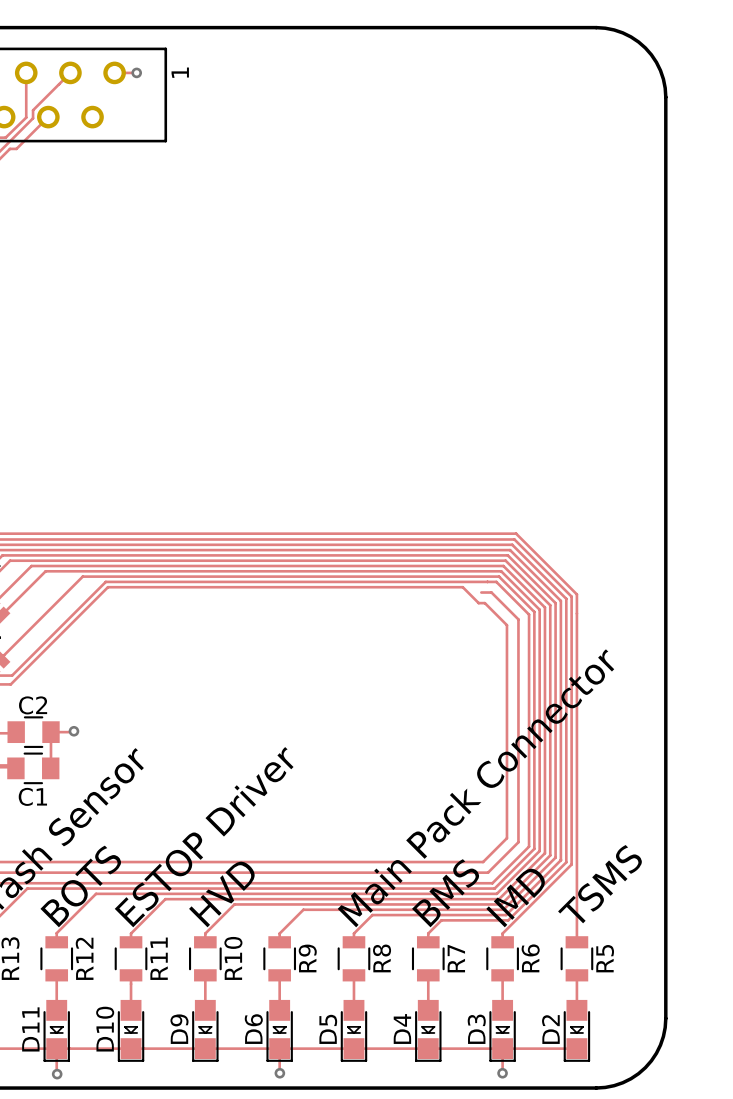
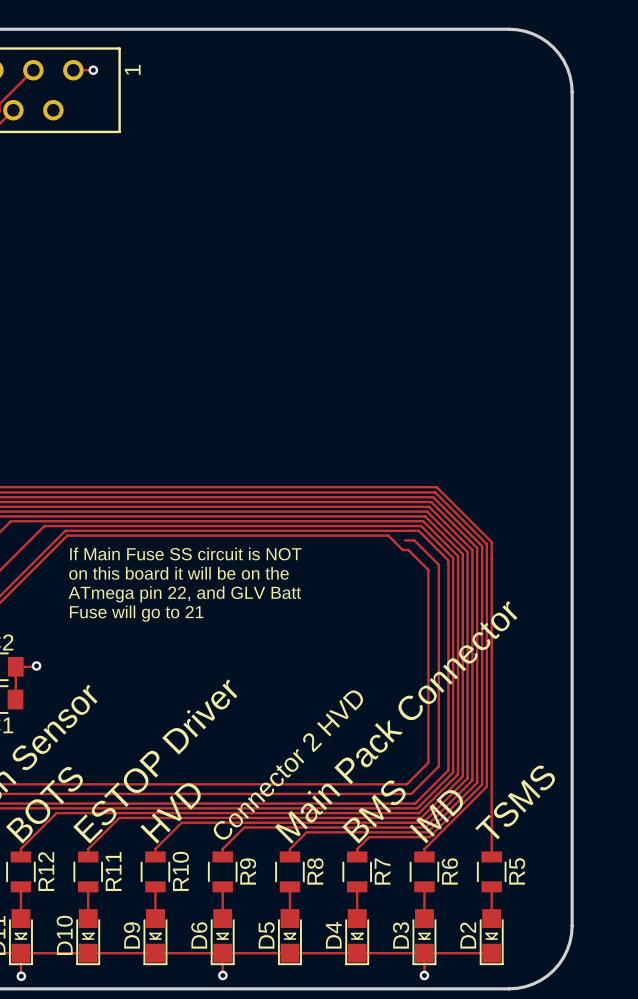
text: none -> If Main Fuse SS circuit is NOT (185, 553)
text: none -> on this board it will be on the (179, 573)
text: none -> ATmega pin 22, and GLV Batt (184, 594)
text: none -> Fuse will go to 21 (136, 613)
text: none -> Connector 2 HVD (288, 765)

